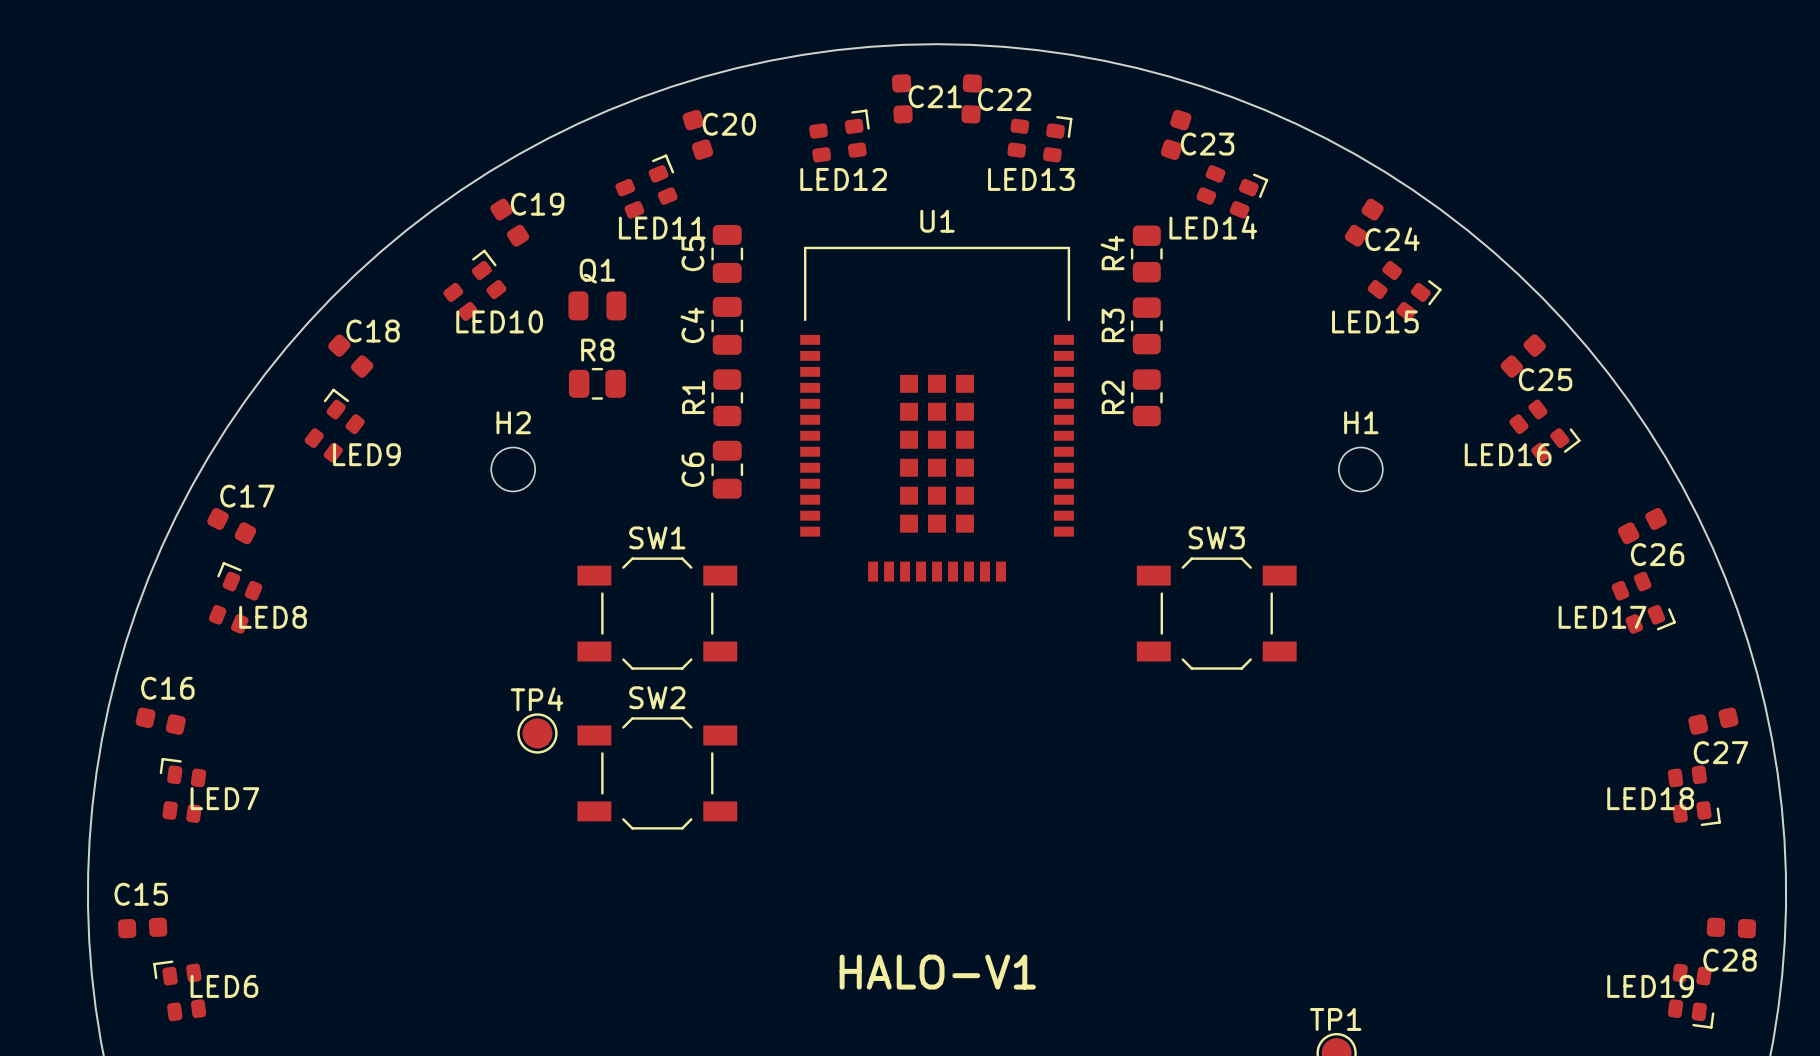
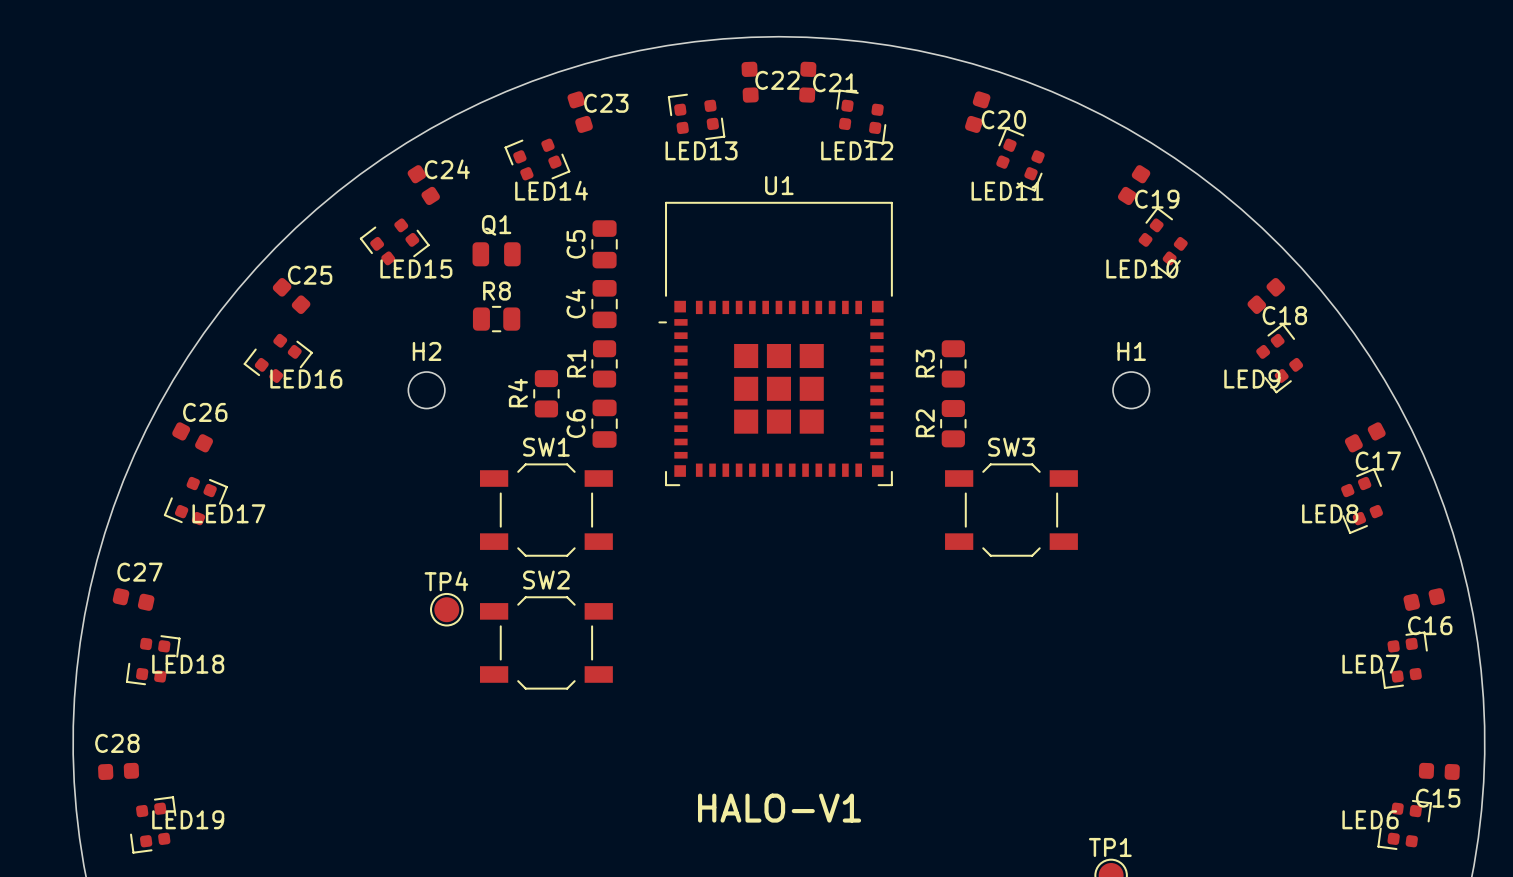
C21 name: C21 (935, 96) -> C22 (777, 80)
C22 name: C22 (1004, 99) -> C21 (835, 82)
LED12 footprint: [809, 109, 870, 163] -> [836, 89, 887, 145]
LED13 footprint: [1007, 115, 1073, 163] -> [667, 93, 726, 141]
C20 name: C20 (729, 124) -> C23 (606, 103)
C23 name: C23 (1207, 144) -> C20 (1003, 119)
LED11 footprint: [615, 154, 678, 219] -> [996, 127, 1045, 192]
LED14 footprint: [1196, 165, 1269, 219] -> [504, 138, 571, 181]
C19 name: C19 (537, 204) -> C24 (447, 169)
C24 name: C24 (1392, 239) -> C19 (1157, 199)
U1 footprint: [800, 246, 1074, 582] -> [658, 201, 893, 487]
LED10 footprint: [443, 249, 507, 322] -> [1138, 207, 1188, 277]
C5 position: (727, 253) -> (604, 244)
R4 position: (1146, 253) -> (546, 393)
LED15 footprint: [1367, 260, 1442, 322] -> [359, 218, 430, 266]
LED10 name position: LED10 (499, 321) -> LED10 (1142, 268)
LED15 name position: LED15 (1375, 321) -> LED15 (416, 268)
C4 position: (727, 325) -> (604, 304)
R3 position: (1146, 325) -> (953, 363)
C18 name: C18 (373, 331) -> C25 (310, 275)
C25 name: C25 (1545, 379) -> C18 (1284, 315)
LED9 footprint: [304, 388, 365, 463] -> [1256, 323, 1304, 394]
R1 position: (727, 397) -> (604, 363)
R2 position: (1146, 397) -> (953, 423)
LED16 footprint: [1509, 399, 1581, 463] -> [243, 333, 313, 383]
LED9 name position: LED9 (366, 454) -> LED9 (1252, 378)
LED16 name position: LED16 (1508, 454) -> LED16 (306, 378)
C6 position: (727, 469) -> (604, 423)
C17 name: C17 (247, 496) -> C26 (205, 412)
C26 name: C26 (1657, 554) -> C17 (1378, 461)
LED8 footprint: [208, 562, 263, 634] -> [1341, 468, 1383, 534]
LED17 footprint: [1611, 571, 1676, 634] -> [163, 476, 228, 526]
LED8 name position: LED8 (273, 617) -> LED8 (1330, 513)
LED17 name position: LED17 (1602, 617) -> LED17 (228, 513)
C16 name: C16 (167, 688) -> C27 (139, 572)
C27 name: C27 (1720, 752) -> C16 (1430, 625)
LED7 footprint: [159, 757, 207, 823] -> [1381, 631, 1428, 689]
LED18 footprint: [1667, 765, 1721, 827] -> [125, 635, 181, 686]
LED7 name position: LED7 (224, 798) -> LED7 (1370, 664)
LED18 name position: LED18 (1650, 798) -> LED18 (188, 664)
C15 name: C15 (141, 894) -> C28 (117, 743)
LED6 footprint: [153, 960, 207, 1022] -> [1377, 799, 1432, 851]
C28 name: C28 (1730, 960) -> C15 (1438, 798)
LED19 footprint: [1667, 963, 1715, 1029] -> [130, 796, 177, 854]
LED6 name position: LED6 (224, 986) -> LED6 (1370, 819)
LED19 name position: LED19 (1650, 986) -> LED19 (188, 819)

